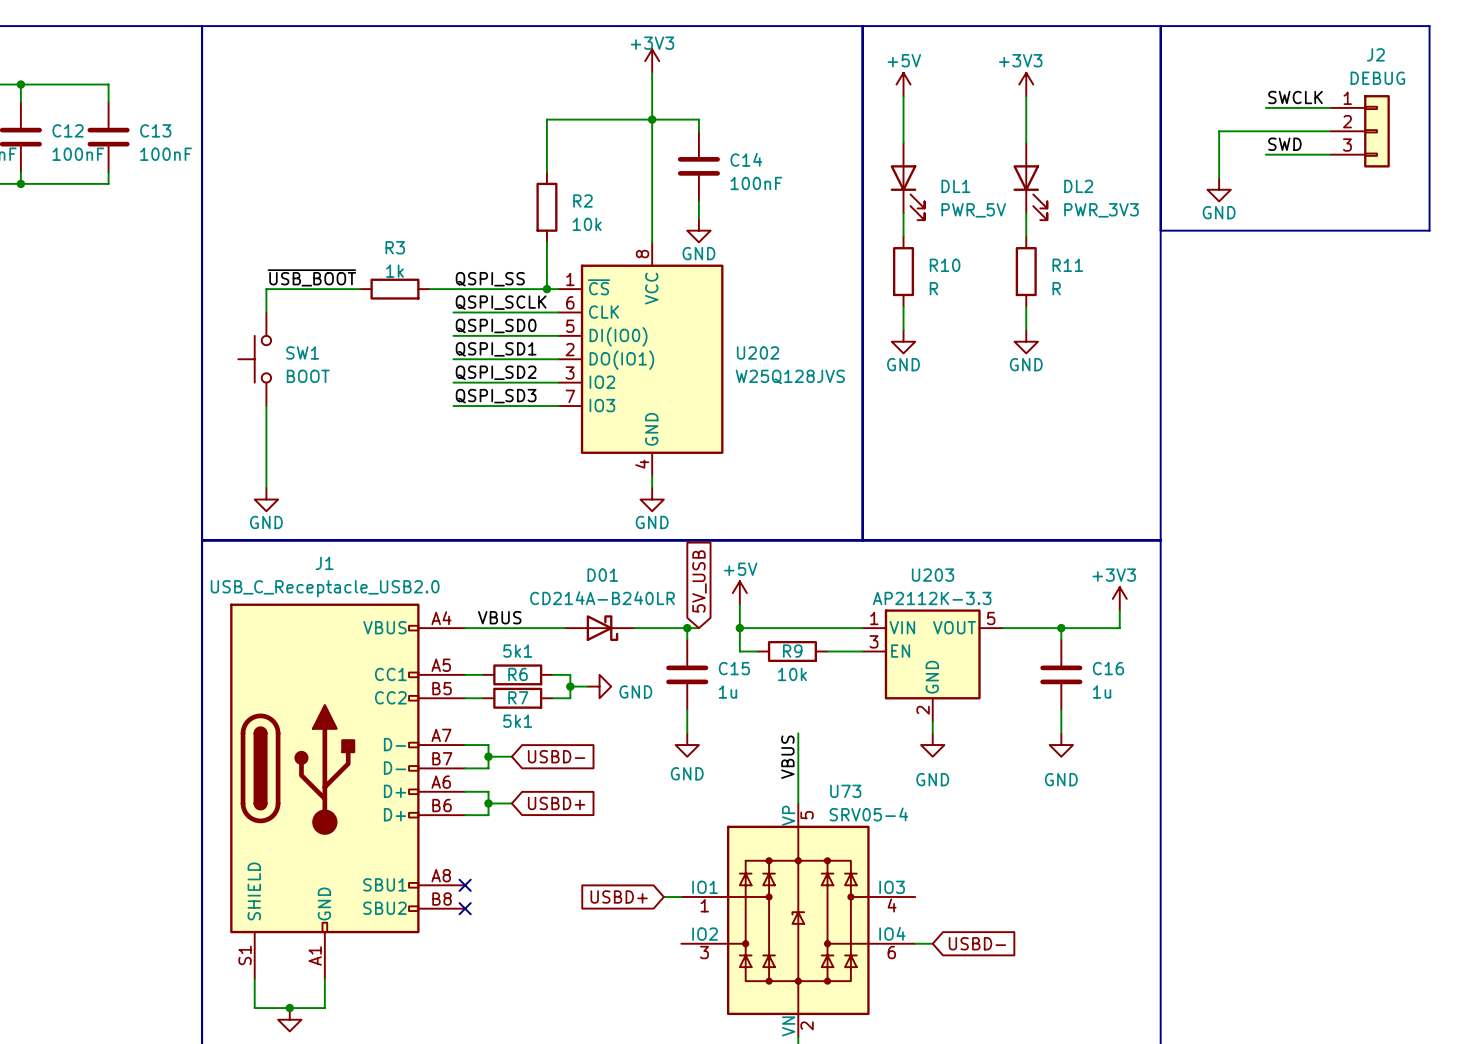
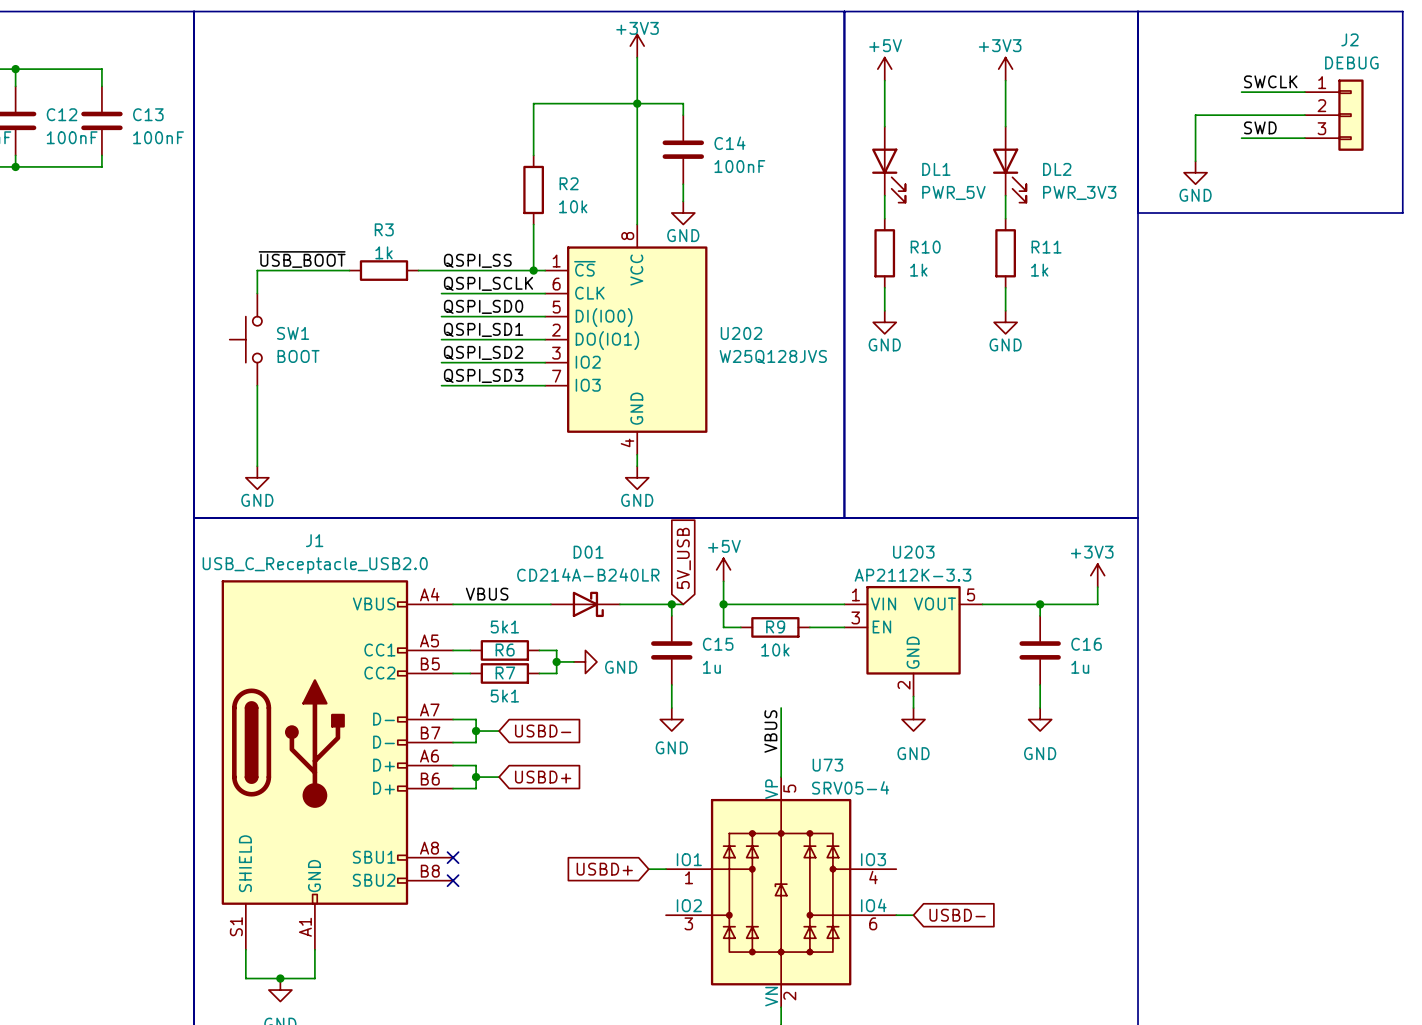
R10 value: R (933, 288) -> 1k (918, 270)
R11 value: R (1056, 288) -> 1k (1039, 270)

